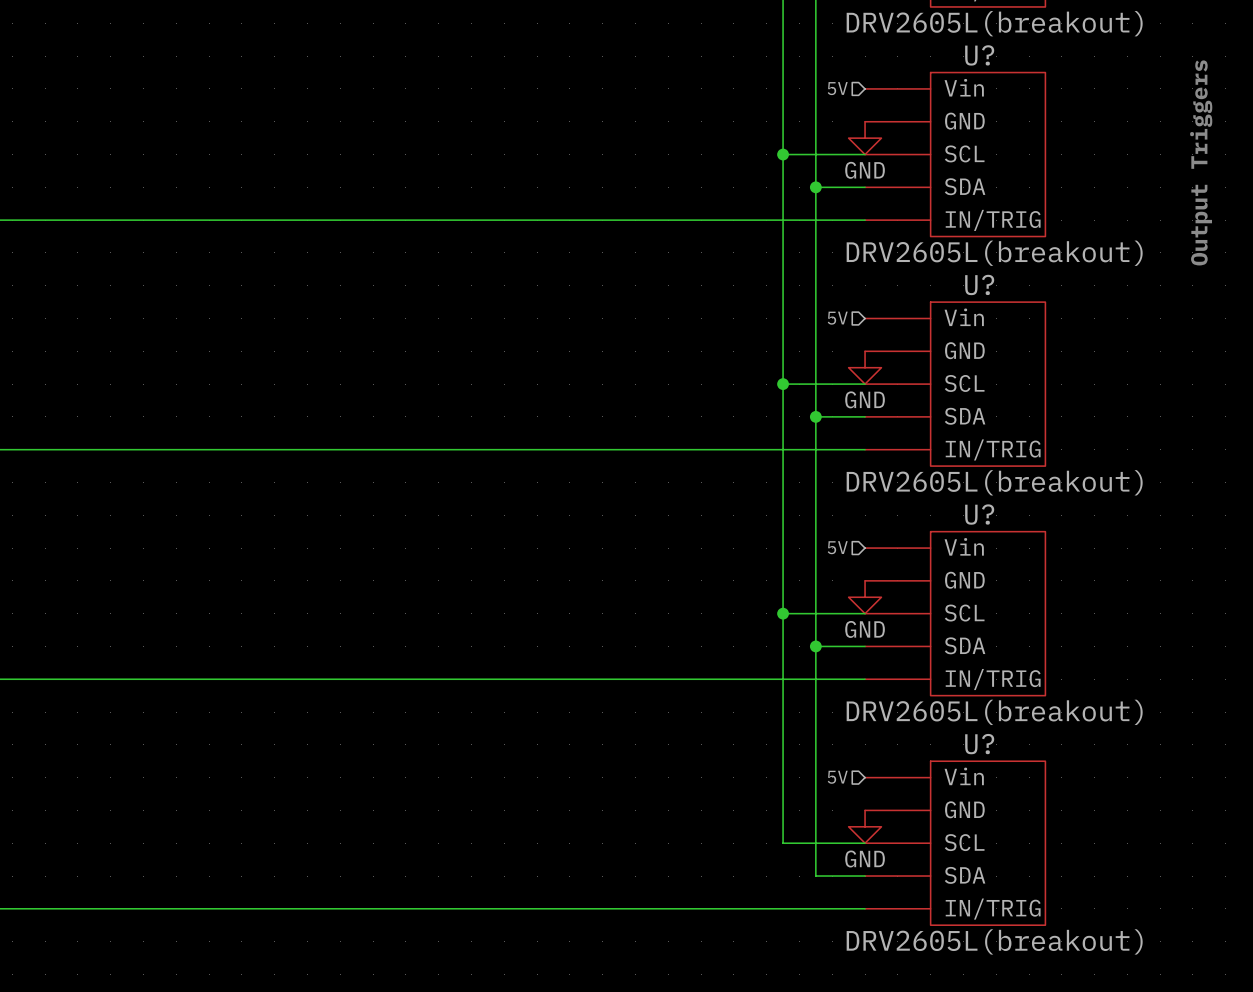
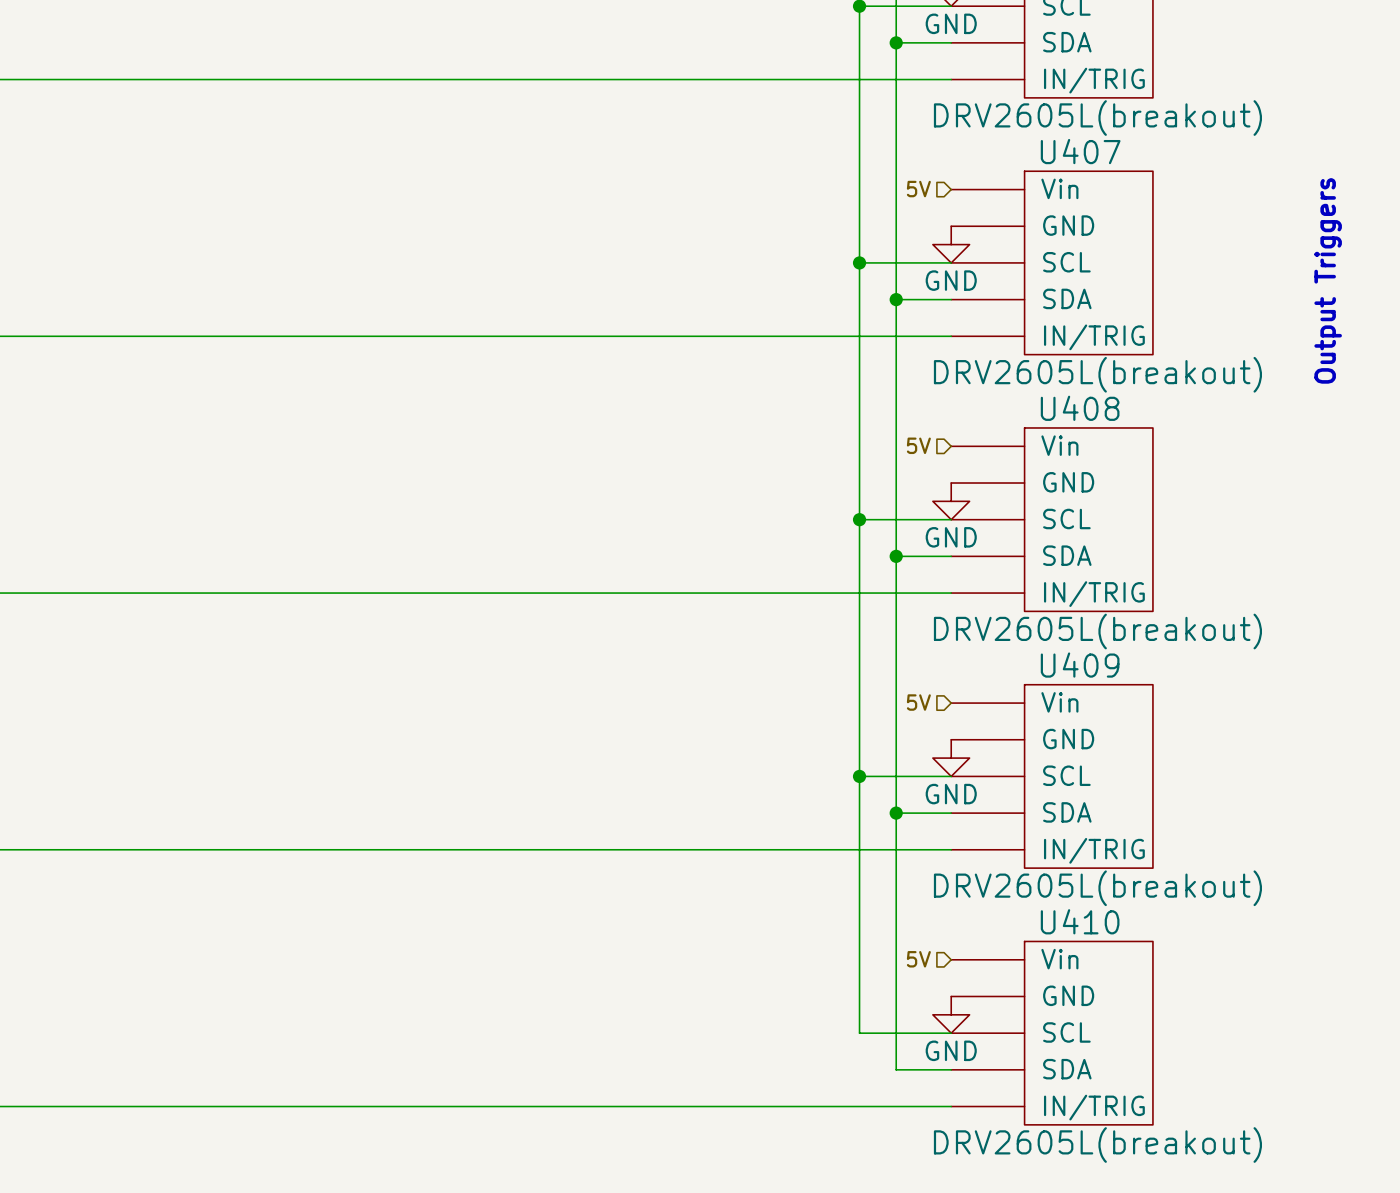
U? name: U? (979, 55) -> U407 (1080, 151)
U? name: U? (979, 284) -> U408 (1080, 408)
U? name: U? (979, 514) -> U409 (1080, 665)
U? name: U? (979, 744) -> U410 (1080, 921)

